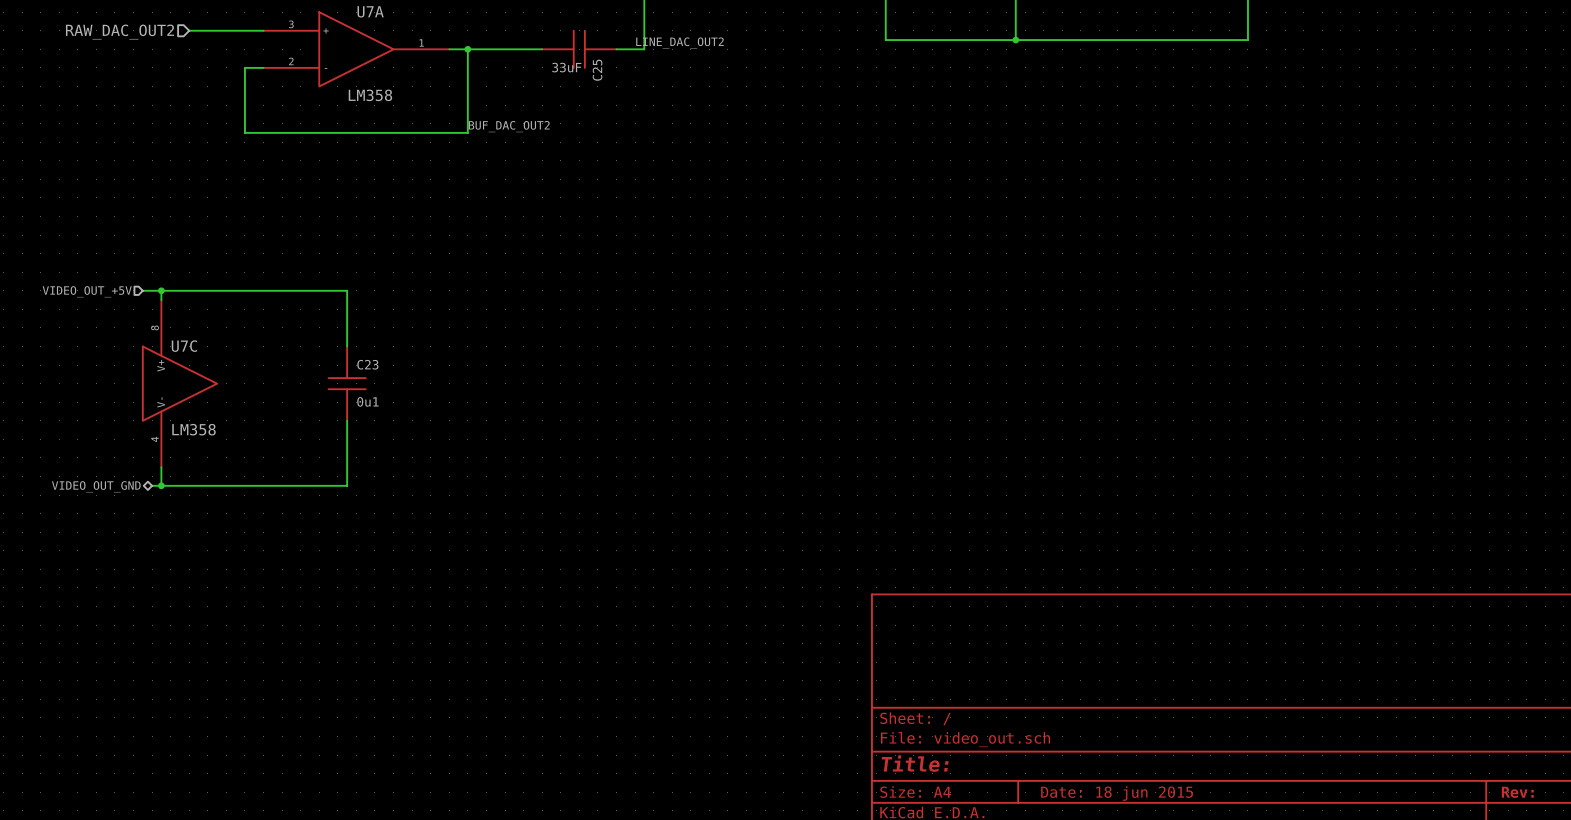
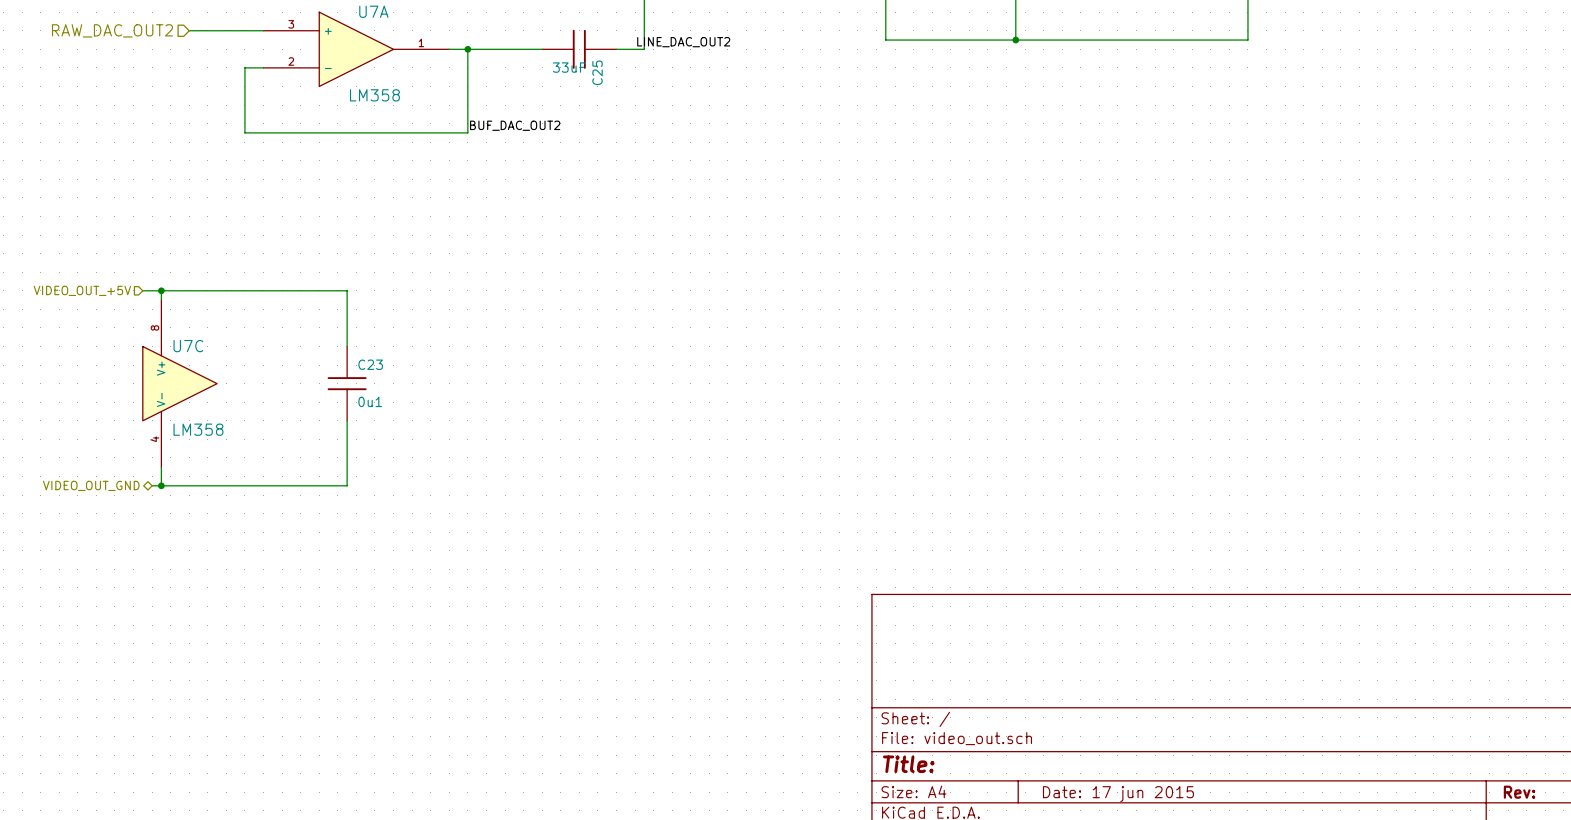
title block: Date: 18 jun 2015 (1117, 793) -> Date: 17 jun 2015 (1118, 794)

